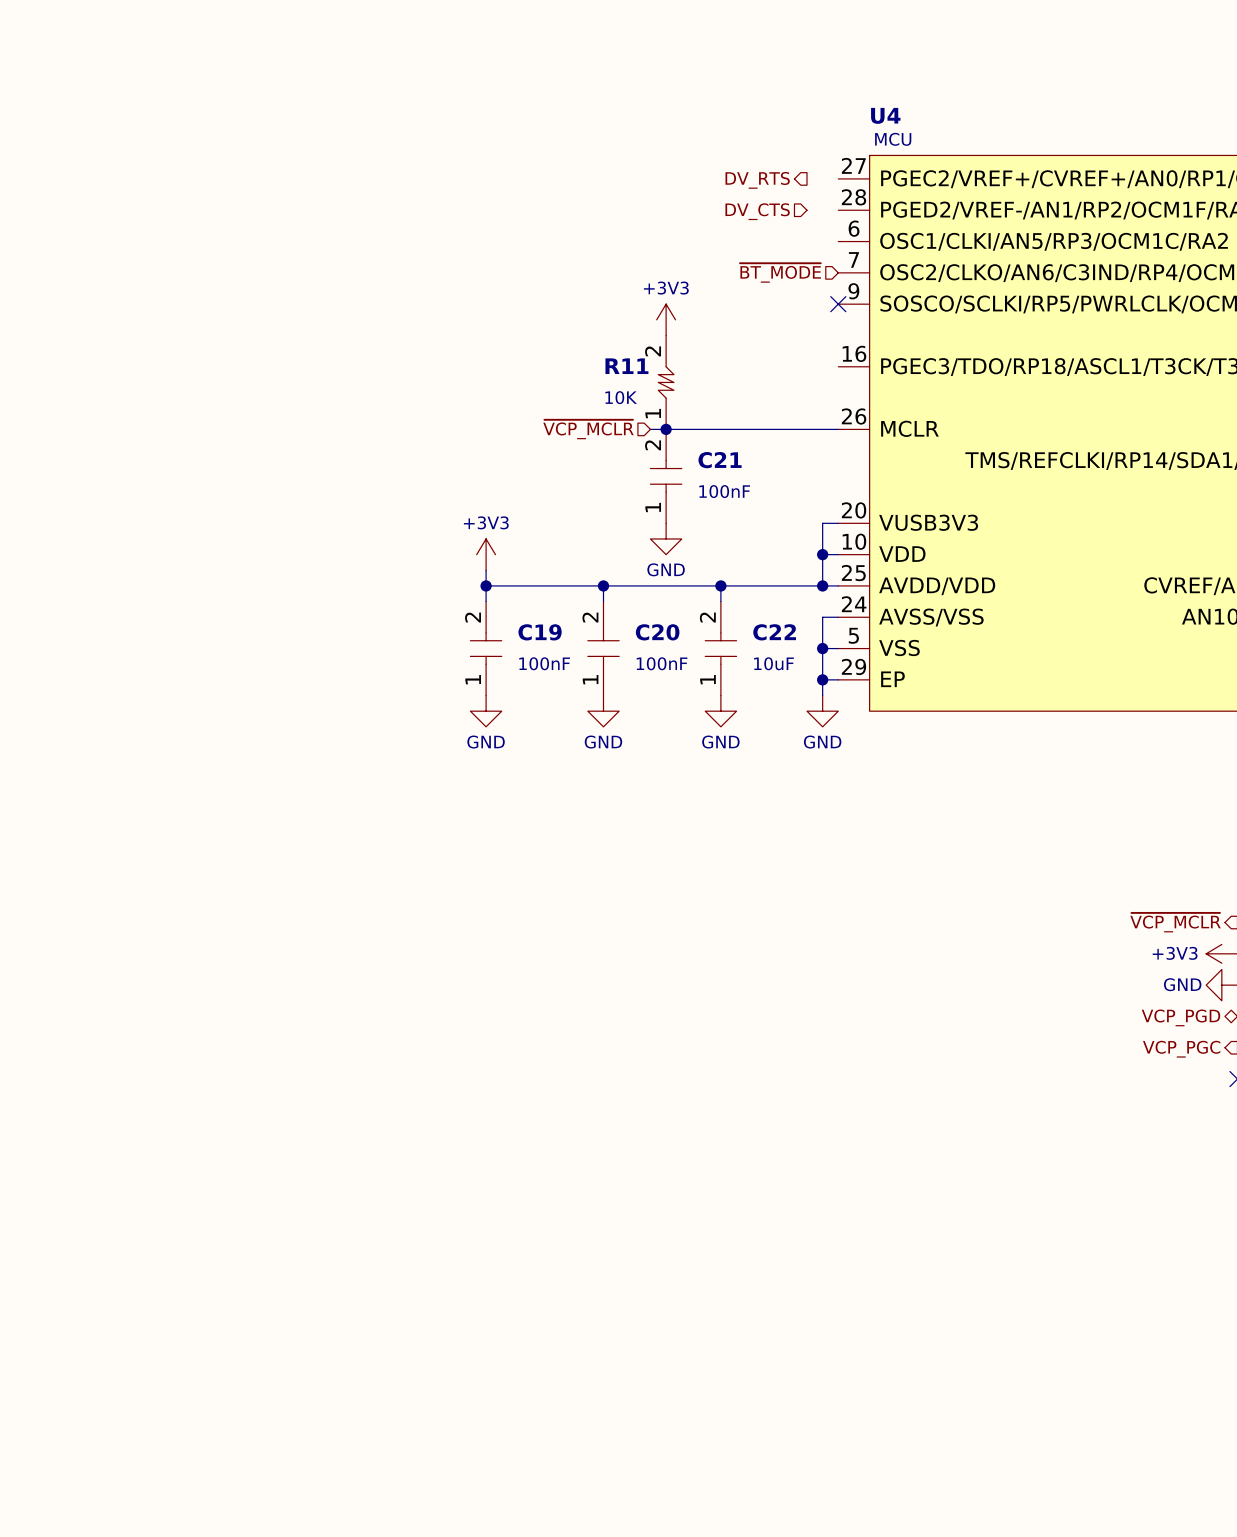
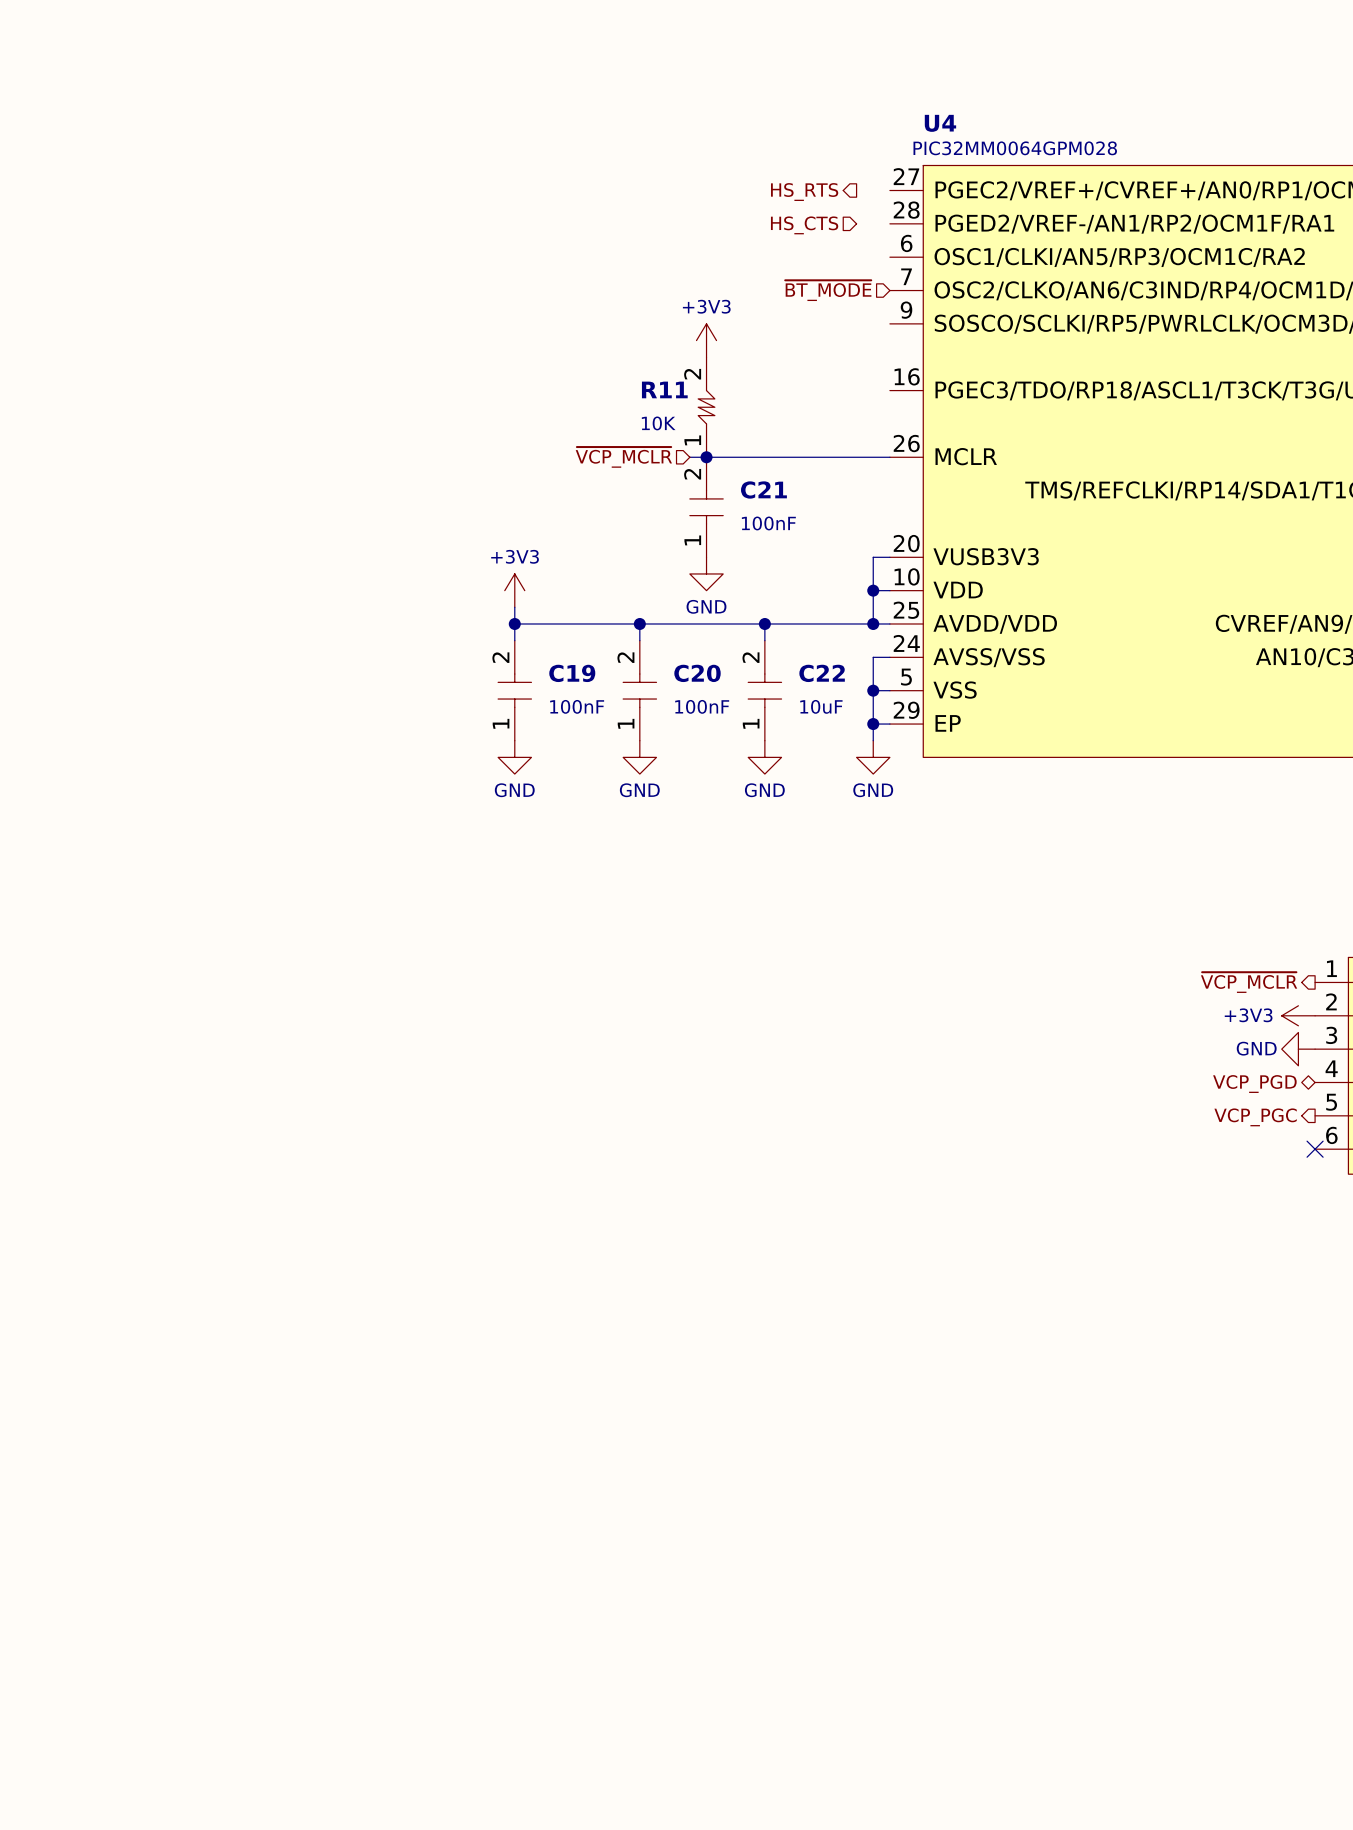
U4 value: MCU (893, 139) -> PIC32MM0064GPM028 (1015, 148)
hierarchical label: DV_RTS (757, 180) -> HS_RTS (804, 192)
hierarchical label: DV_CTS (757, 211) -> HS_CTS (804, 225)
no-connect mark: (838, 304) -> none

